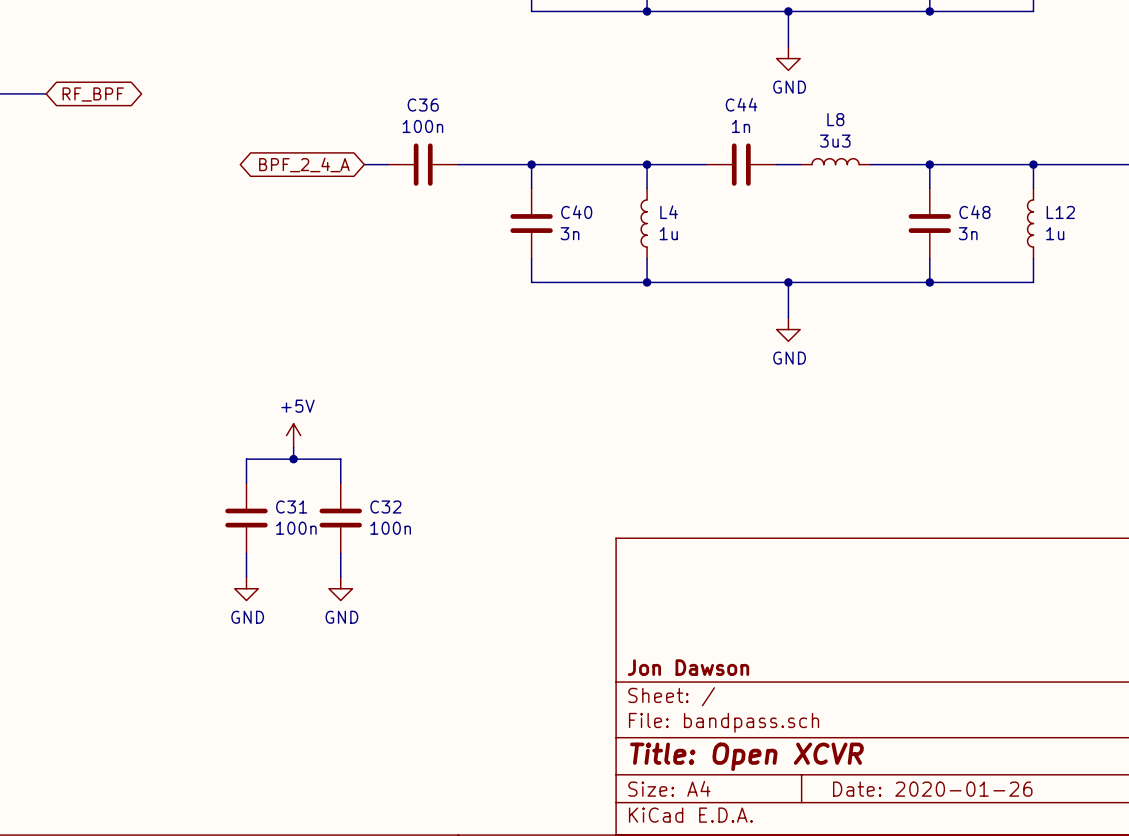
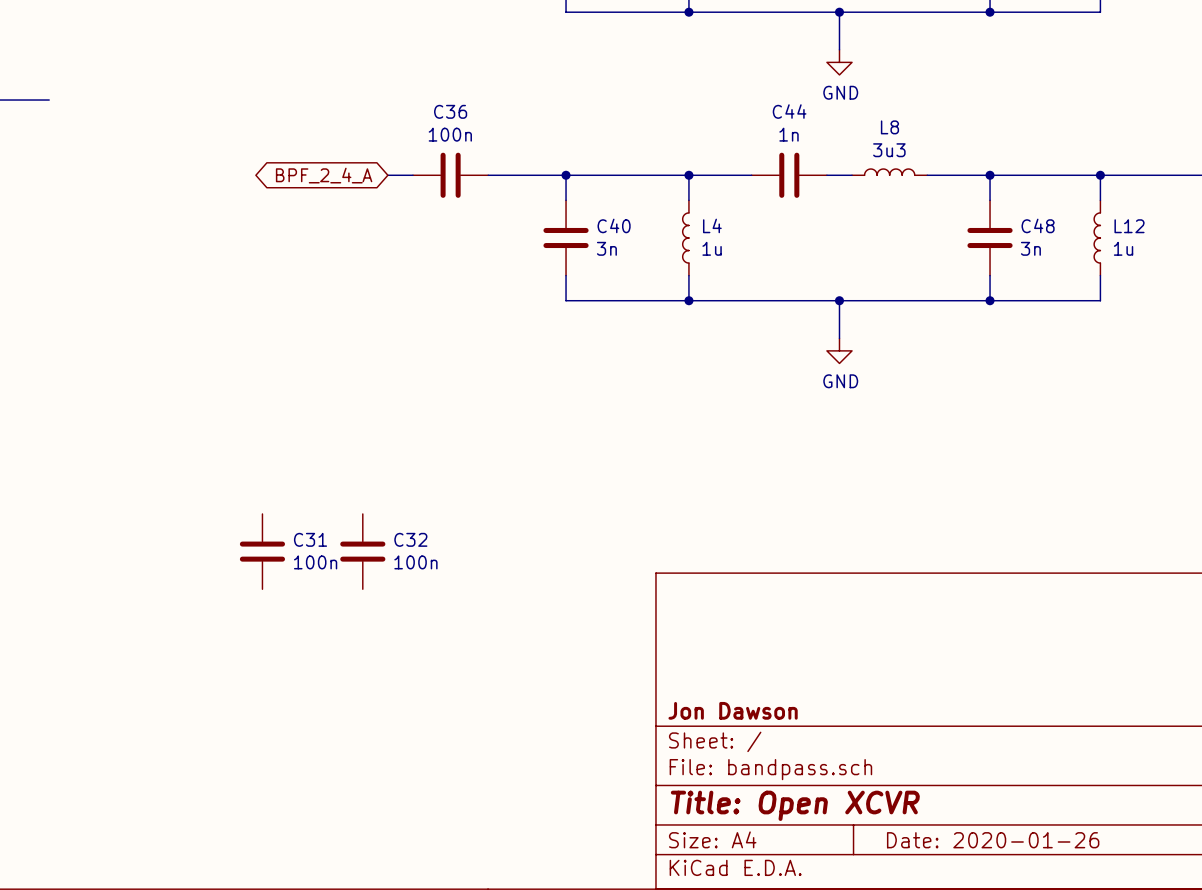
global label: RF_BPF (93, 94) -> none
power symbol: +5V (293, 435) -> none
wire: (293, 447) (293, 459) -> none
junction: (293, 459) -> none
wire: (246, 482) (246, 459) (340, 459) (340, 482) -> none
wire: (246, 553) (246, 576) -> none
wire: (340, 553) (340, 576) -> none
power symbol: GND (246, 588) -> none
power symbol: GND (340, 588) -> none

